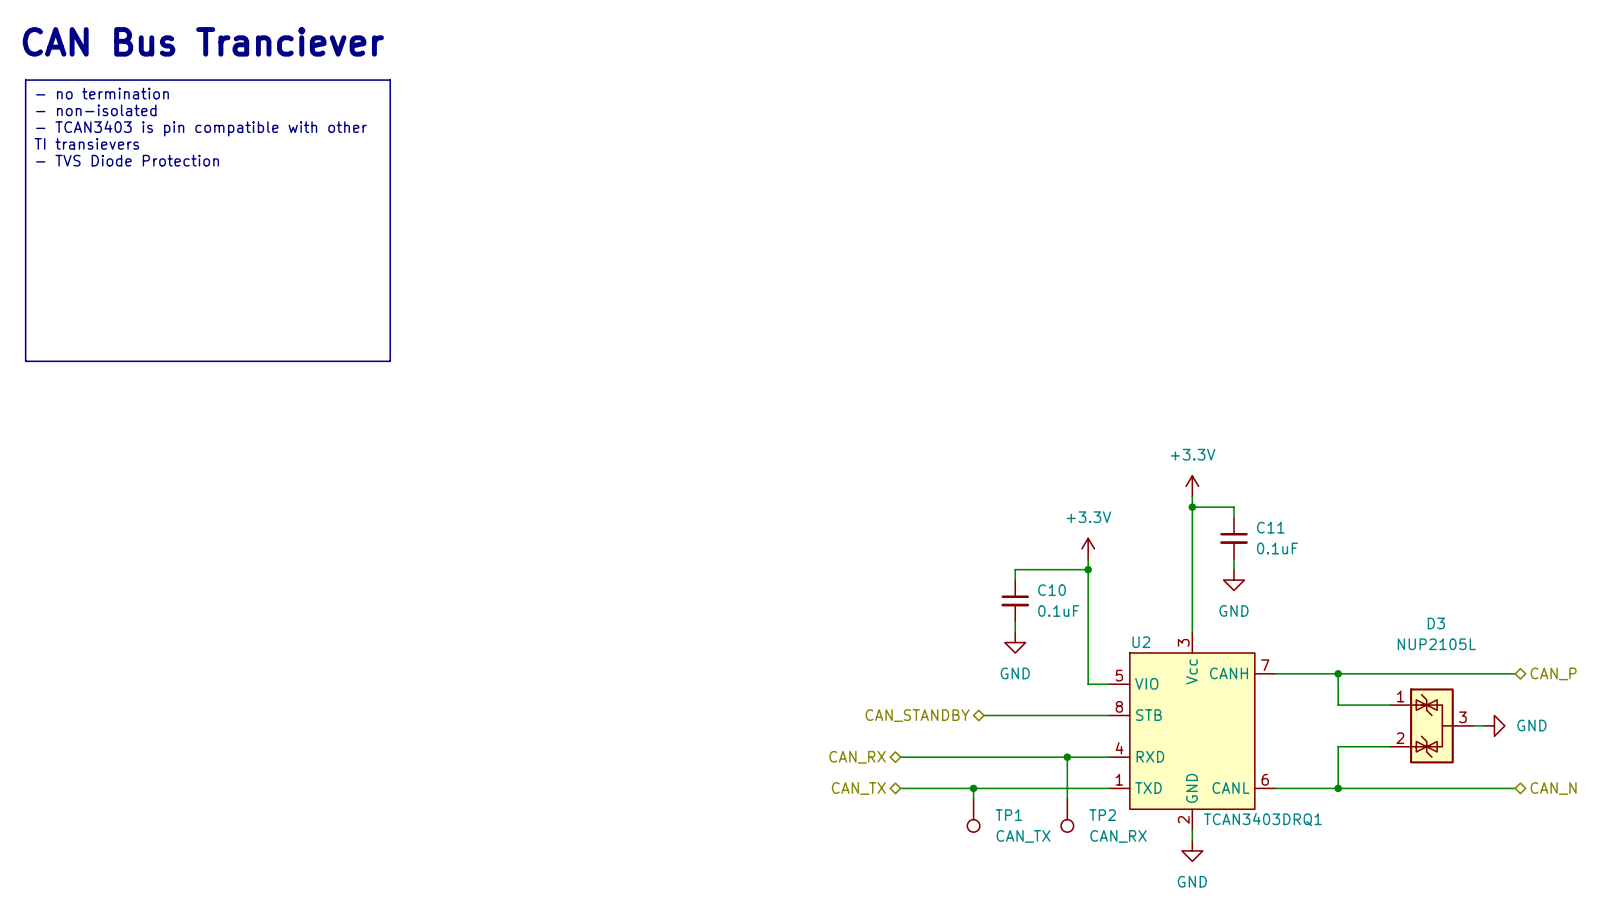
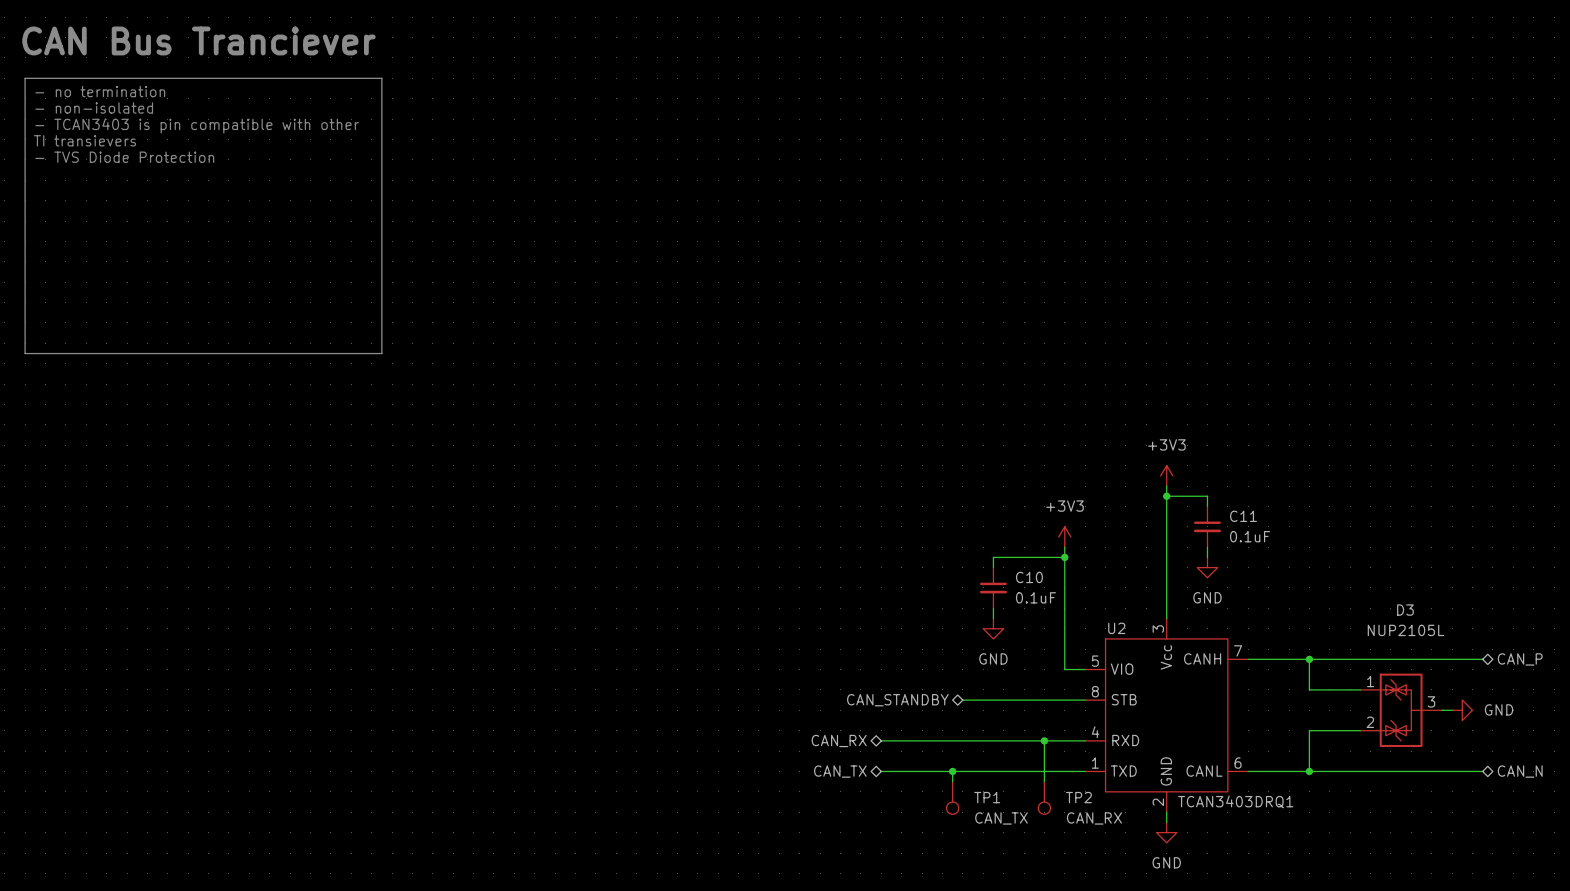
power symbol: +3.3V (1192, 486) -> +3V3 (1166, 475)
power symbol: +3.3V (1088, 548) -> +3V3 (1064, 537)

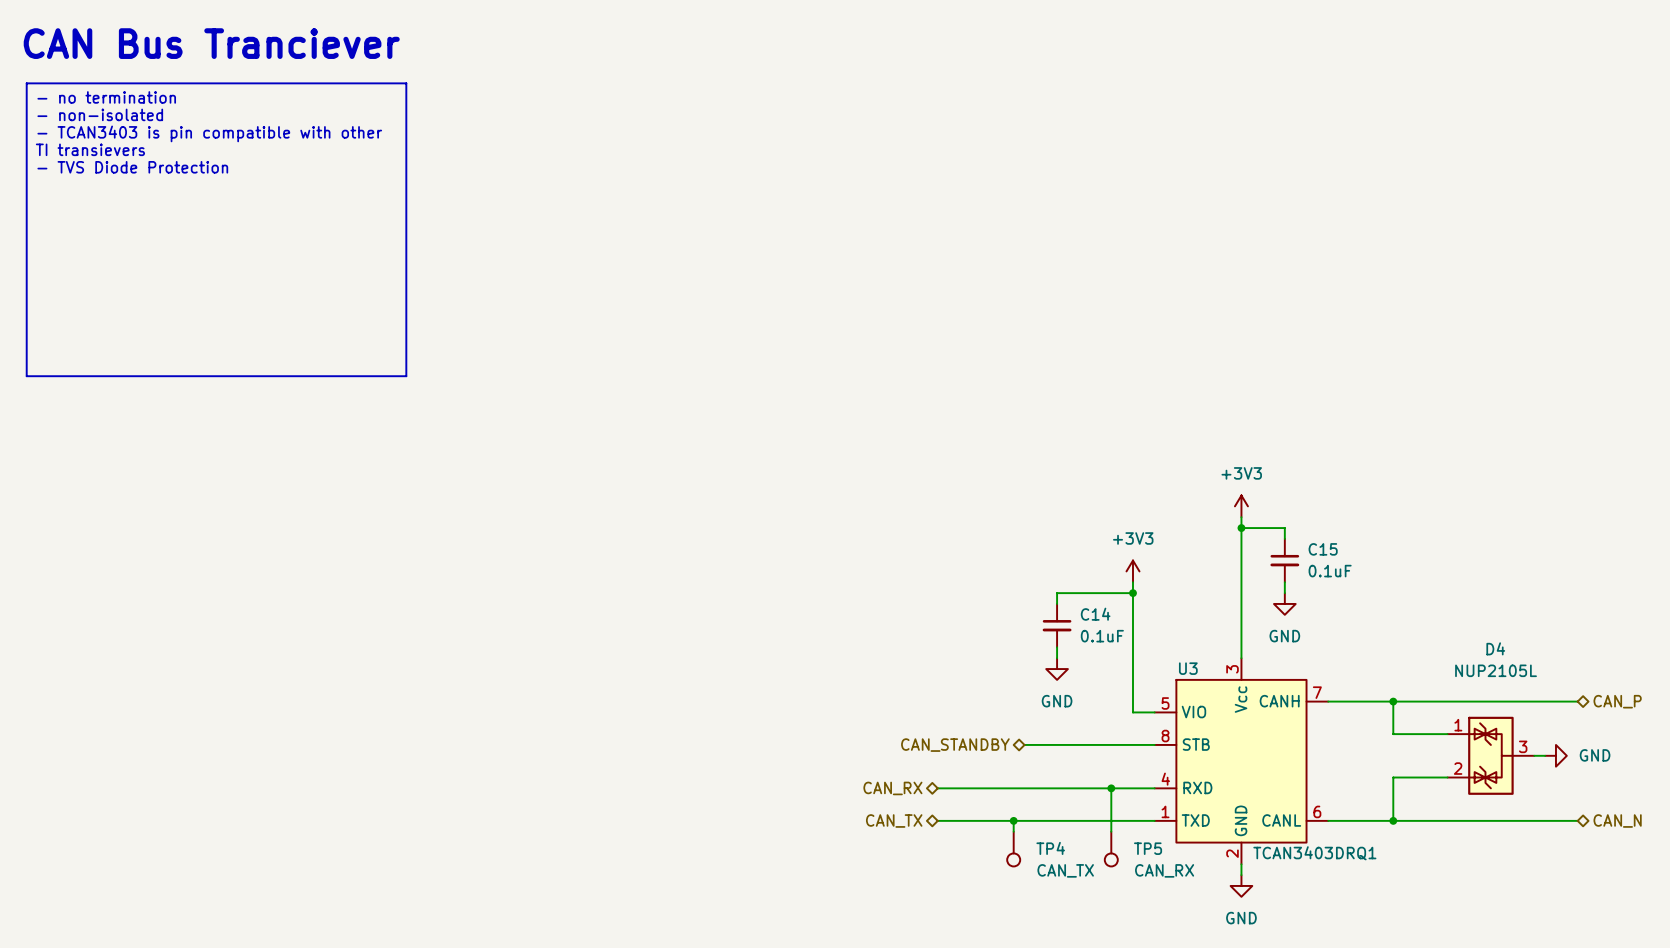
C11 name: C11 (1243, 516) -> C15 (1323, 549)
C10 name: C10 (1029, 577) -> C14 (1095, 614)
D3 name: D3 (1405, 610) -> D4 (1495, 648)
U2 name: U2 (1116, 628) -> U3 (1188, 668)
TP1 name: TP1 (987, 797) -> TP4 (1050, 848)
TP2 name: TP2 (1078, 797) -> TP5 (1148, 848)

